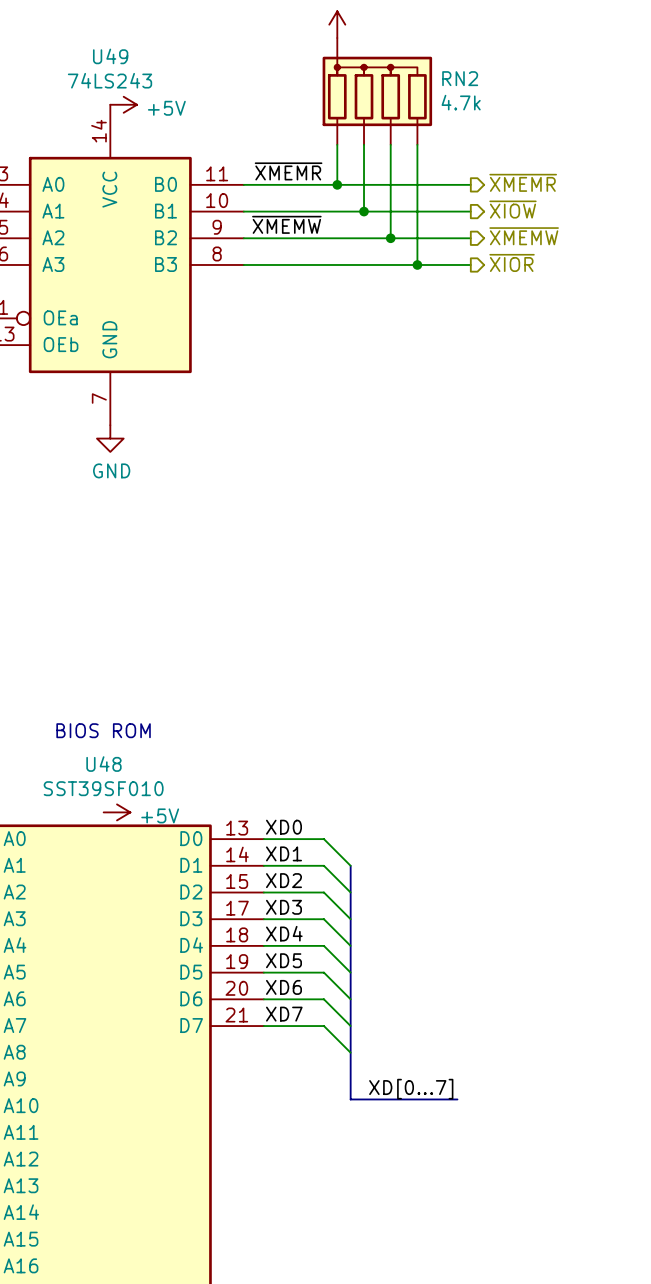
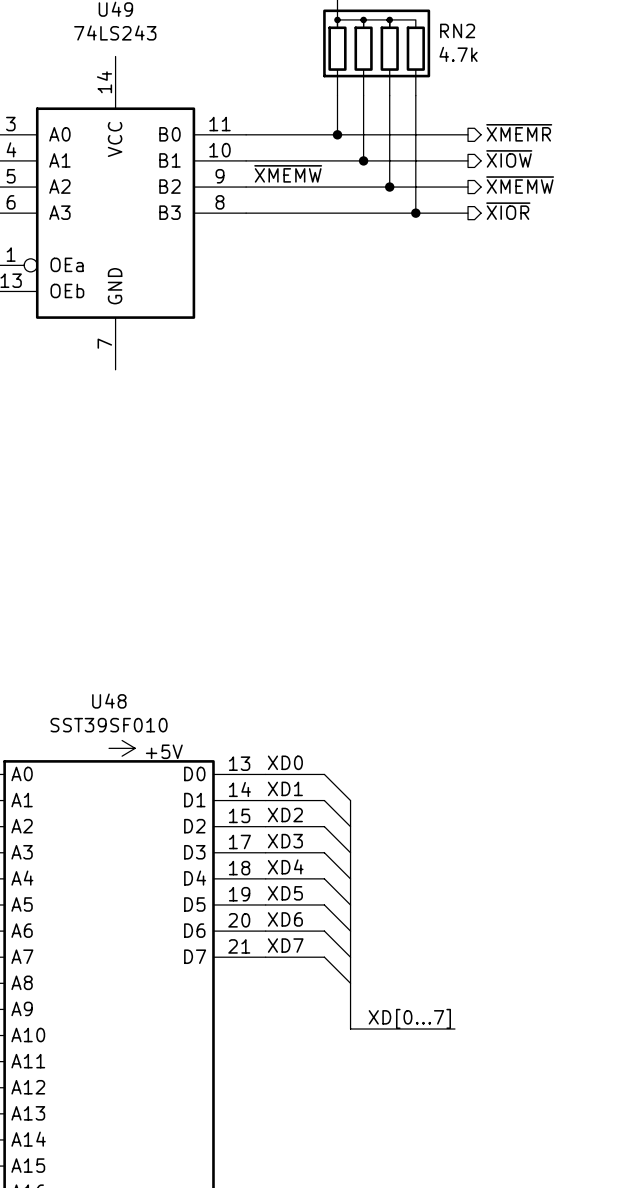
power symbol: +5V (123, 104) -> none
label: ~{XMEMR} (288, 171) -> none
power symbol: GND (110, 438) -> none
text: BIOS ROM (103, 730) -> none

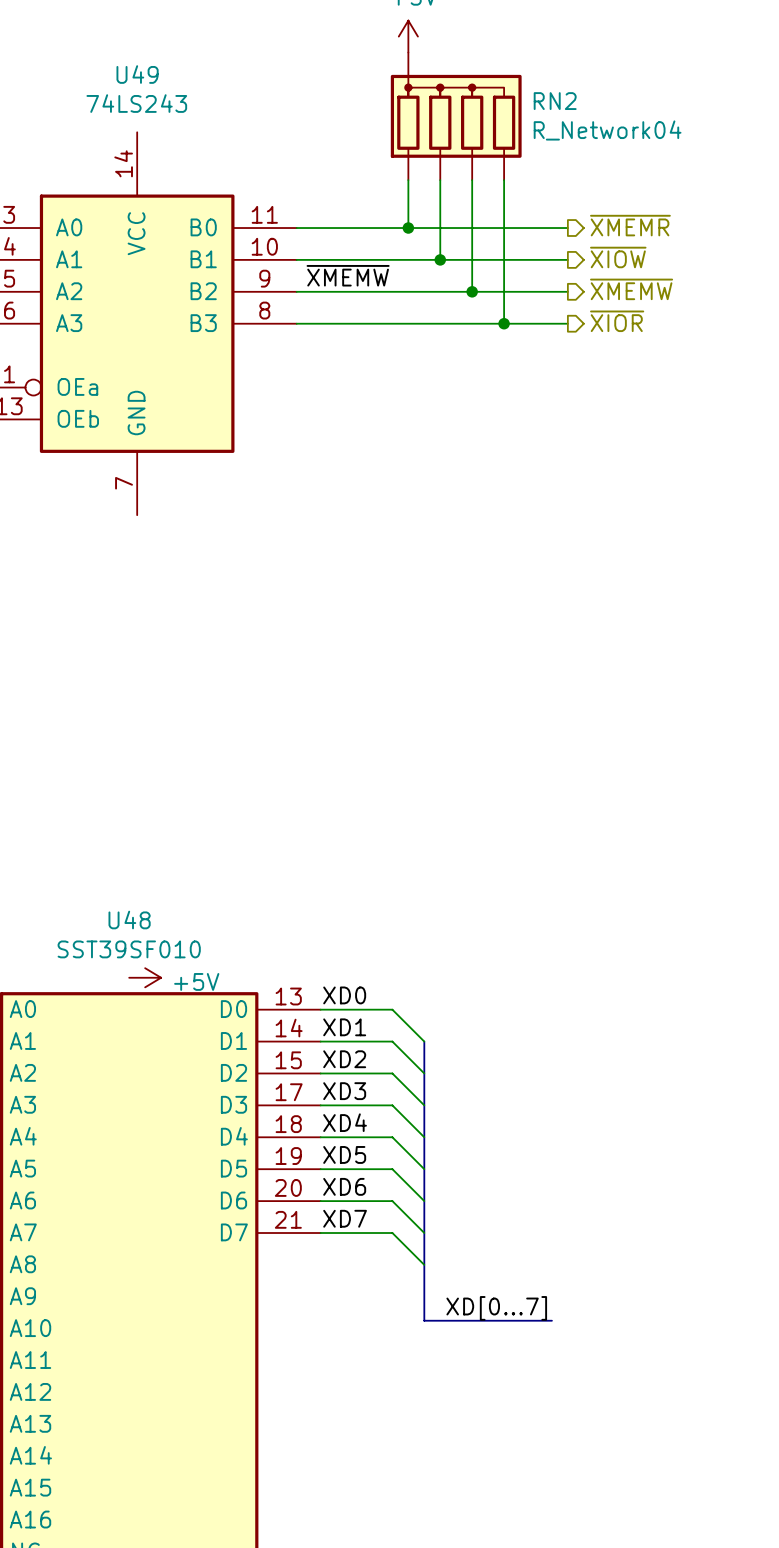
RN2 value: 4.7k (458, 54) -> R_Network04 (607, 130)

